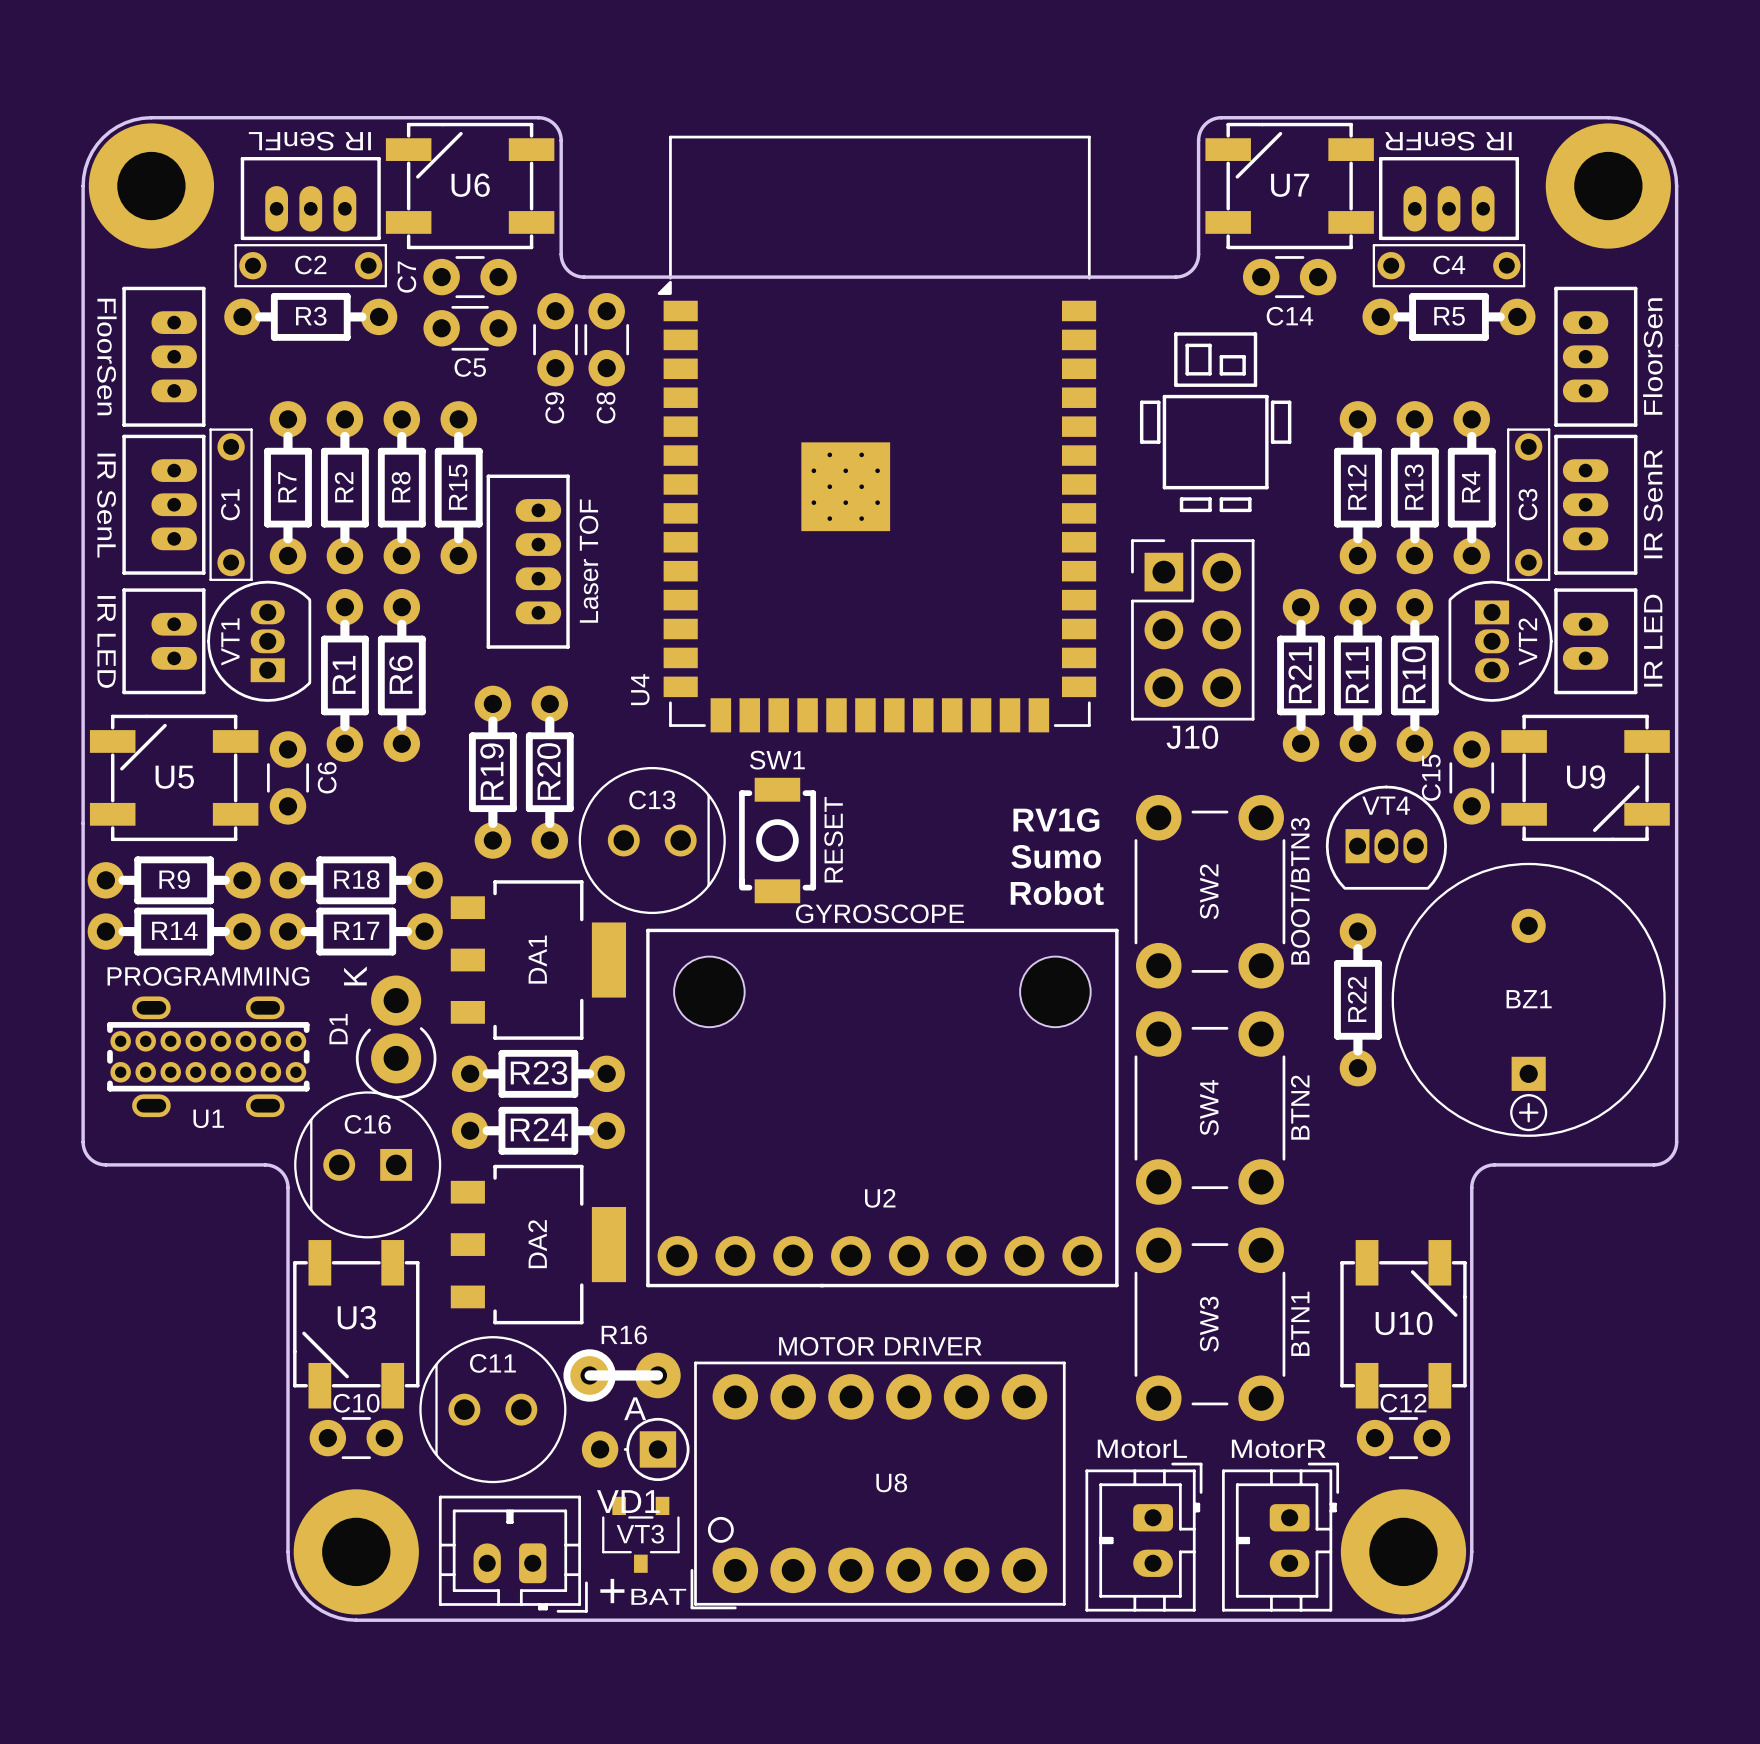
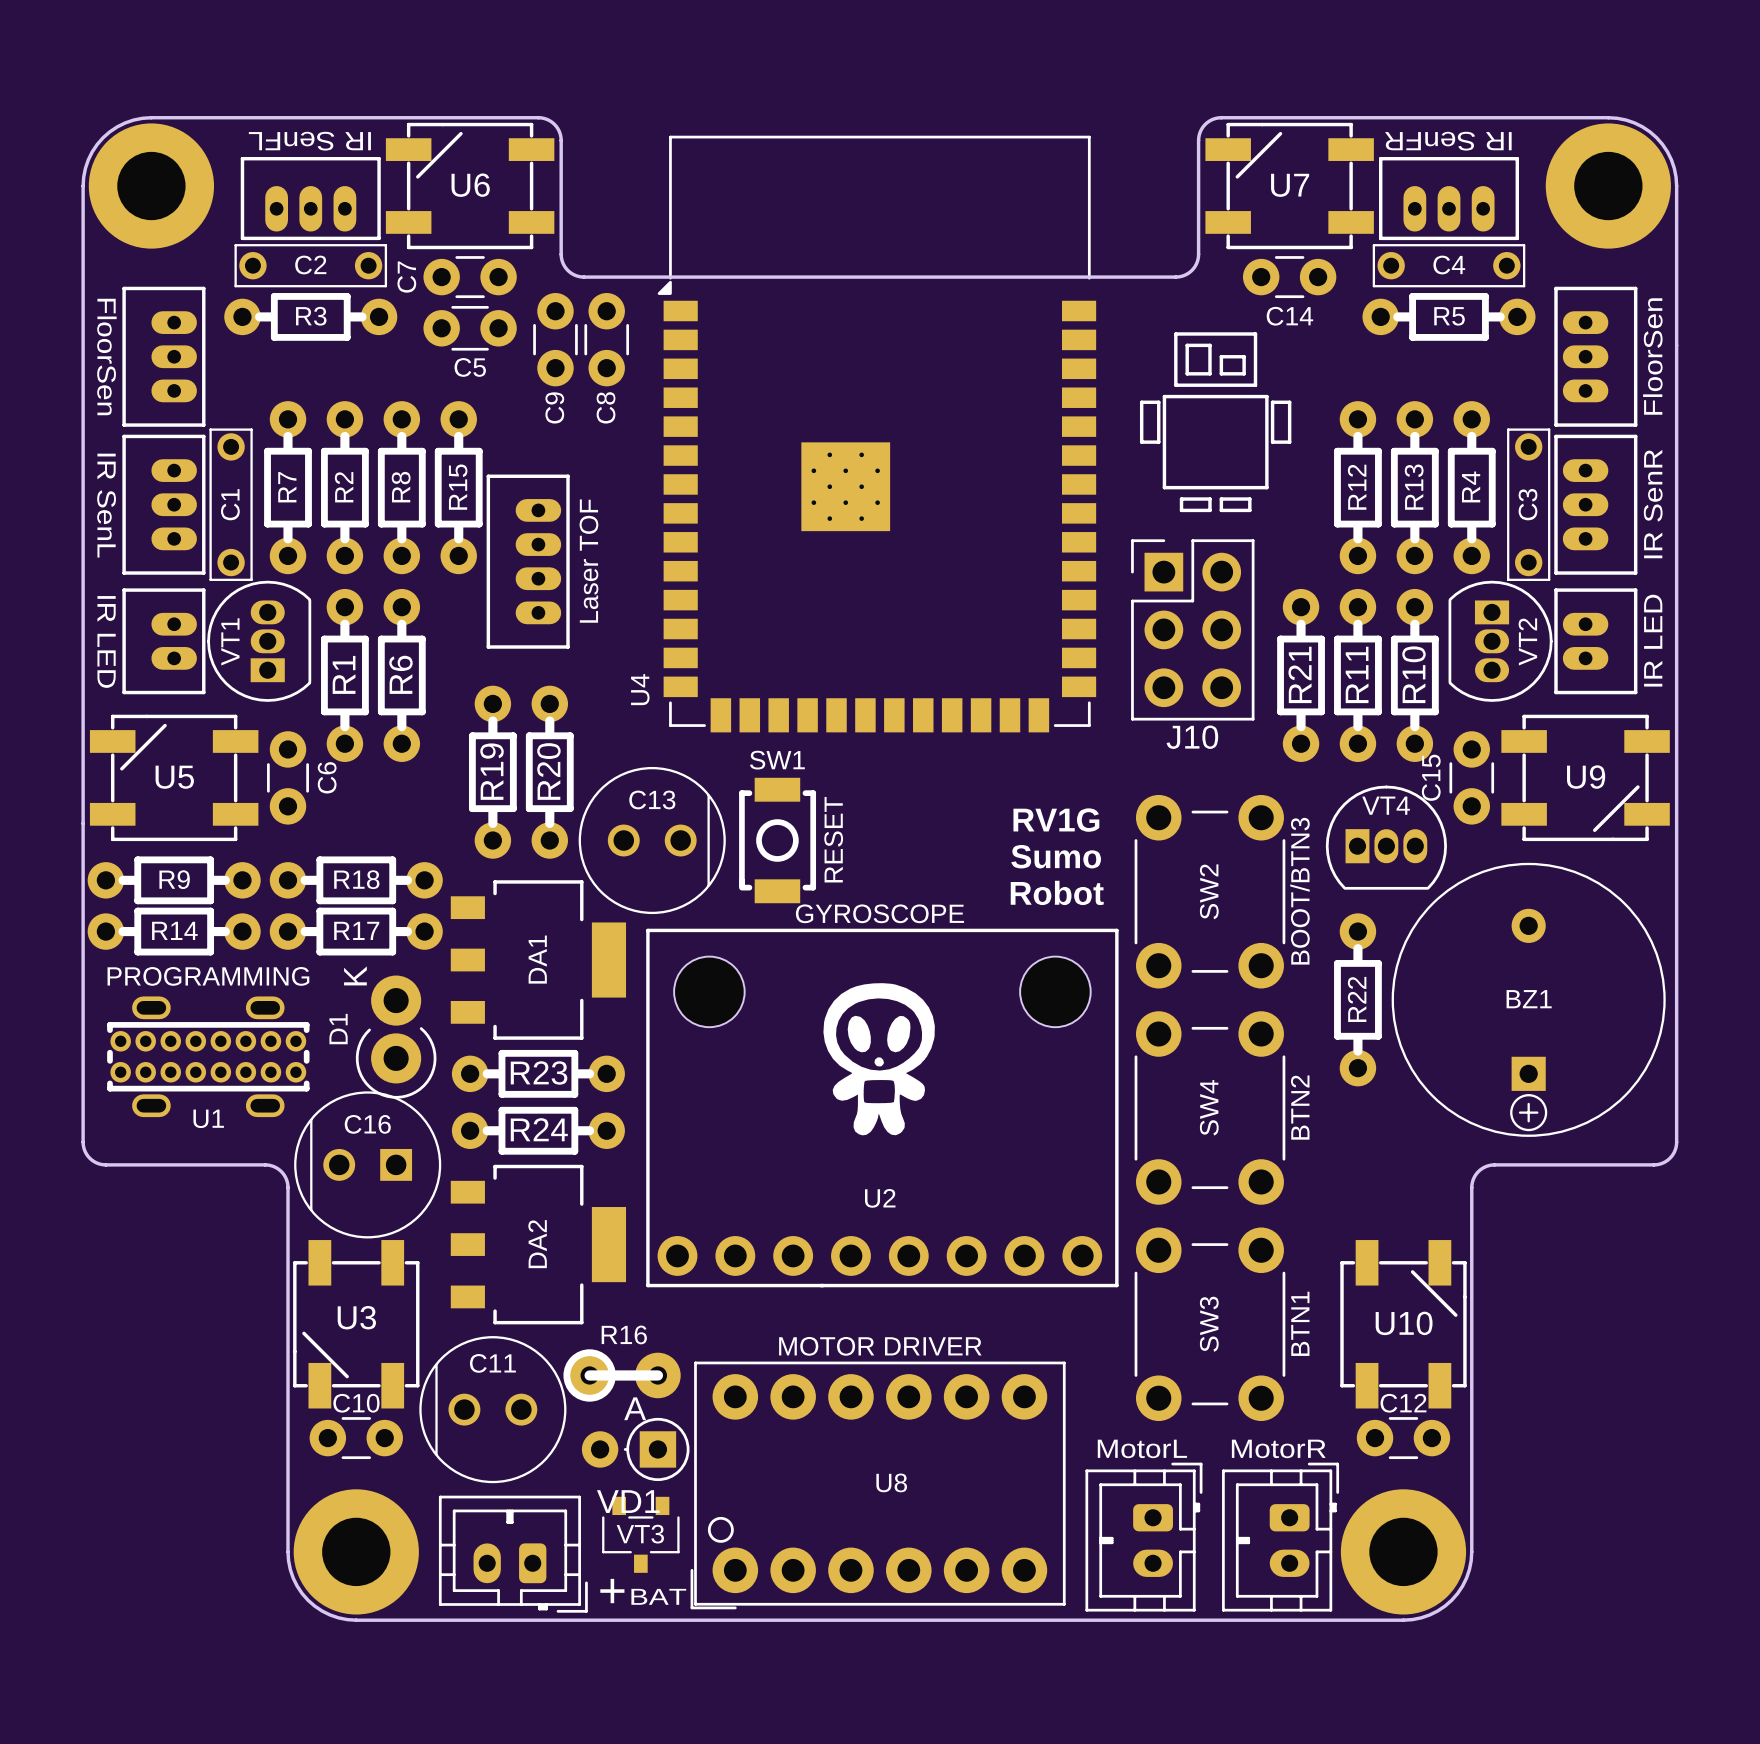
drawing: none -> [823, 983, 935, 1136]

